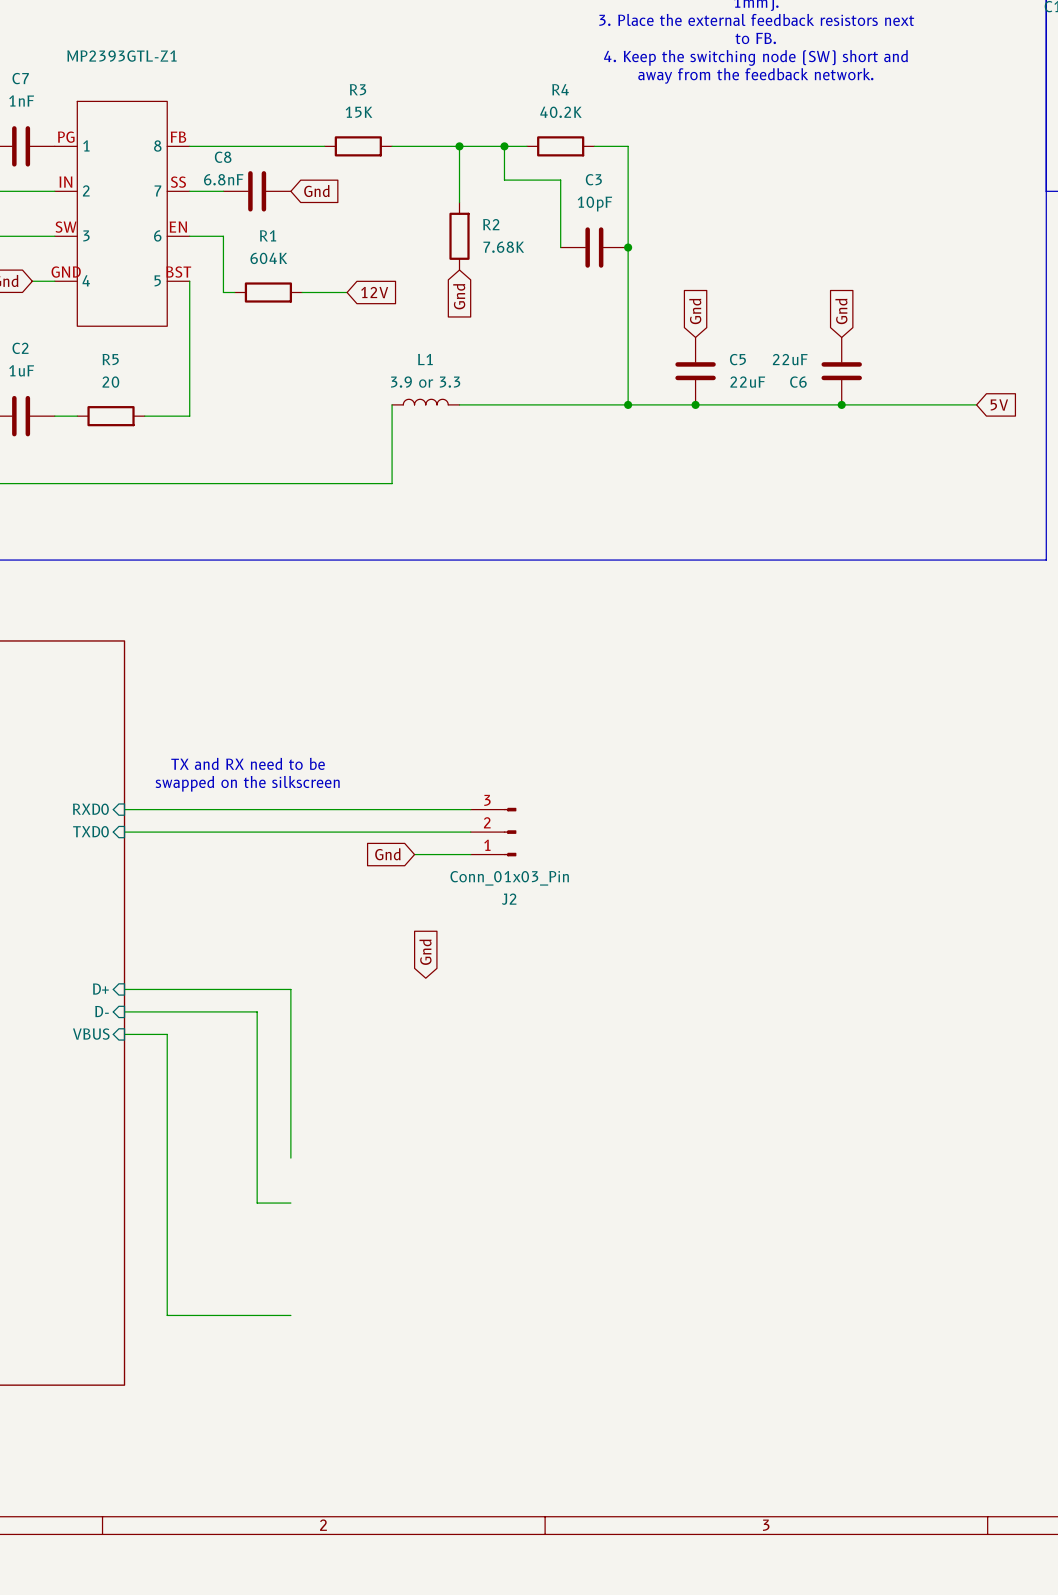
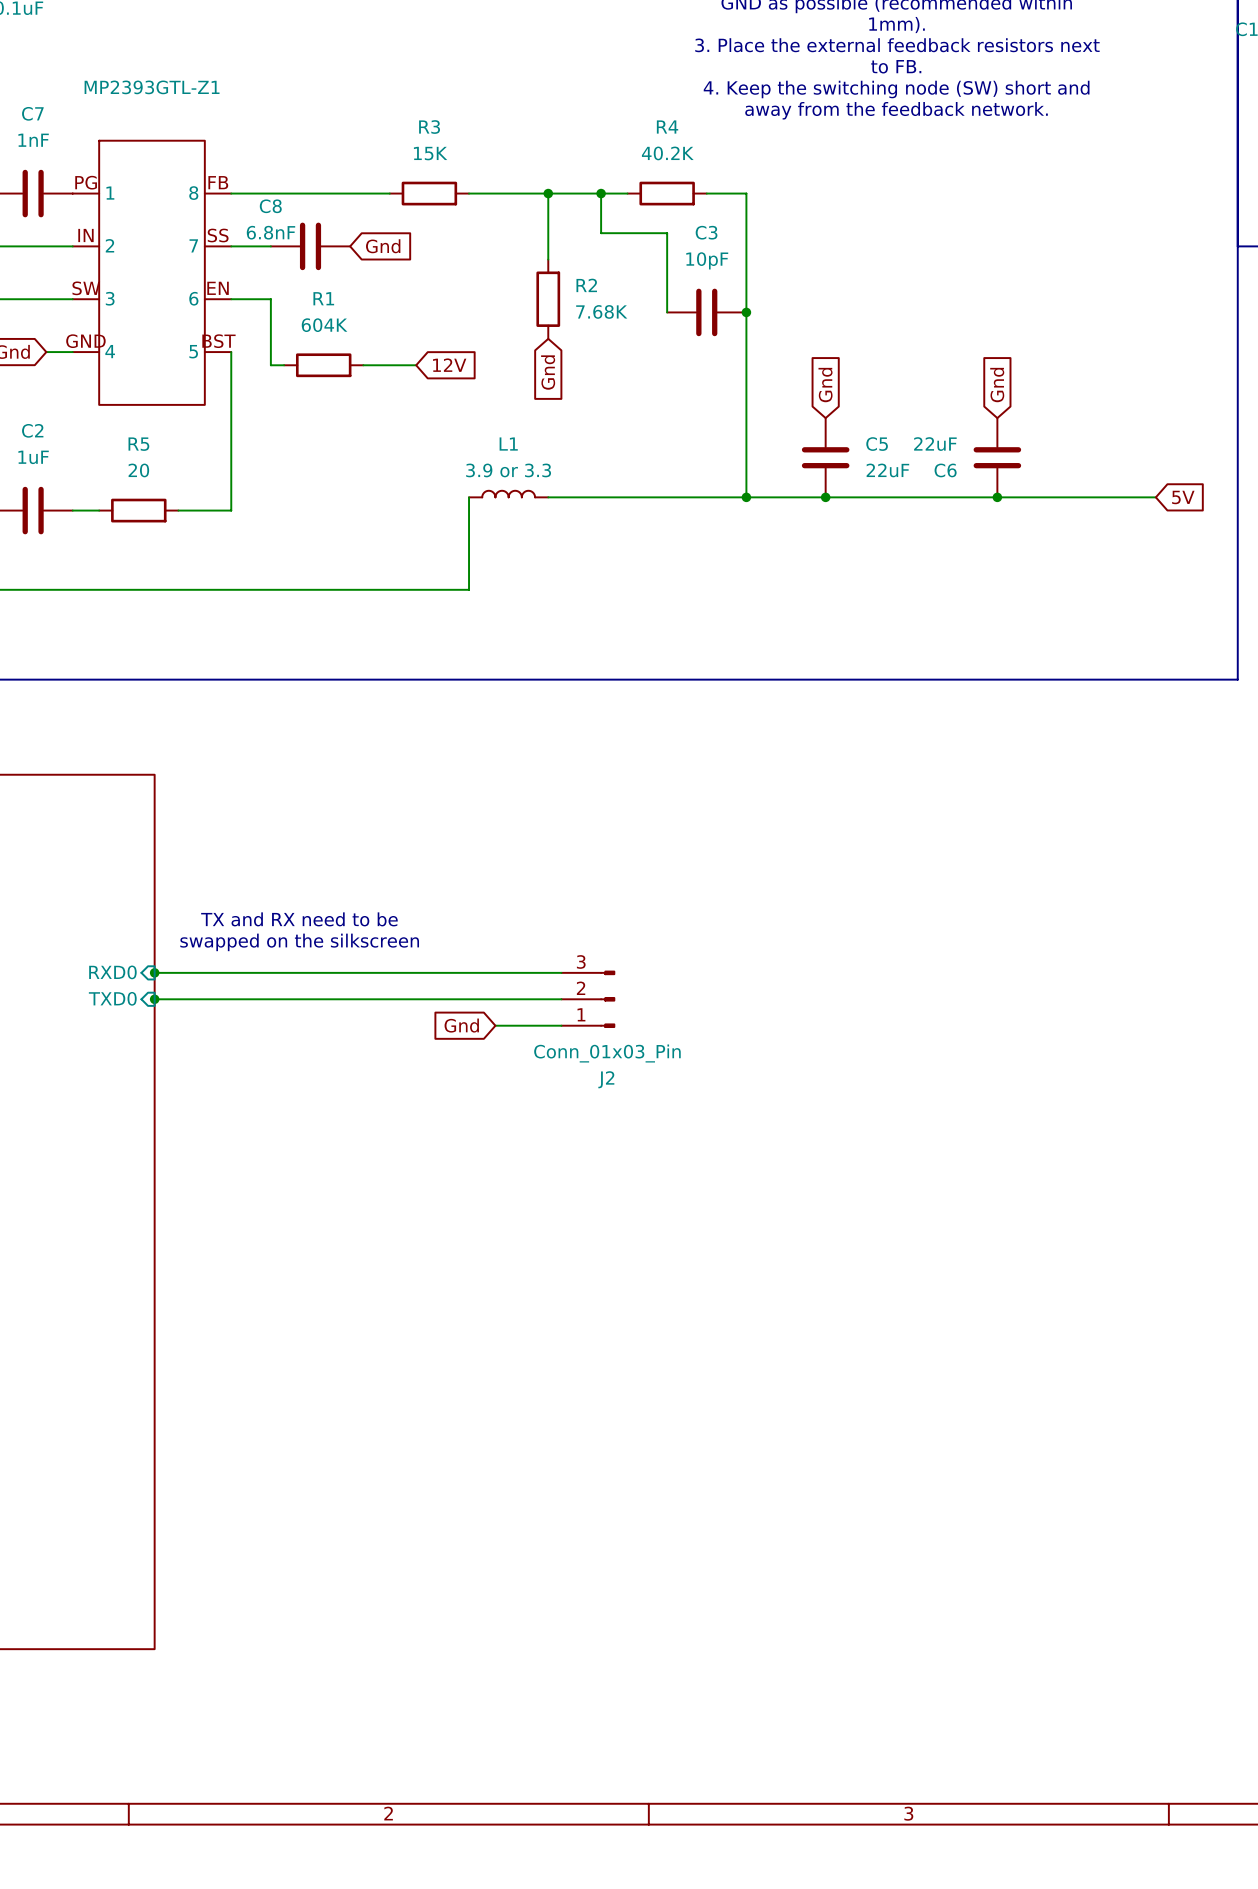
junction: none -> (154, 972)
junction: none -> (154, 999)
global label: Gnd (425, 952) -> none
sheet pin: D+ (100, 989) -> none
wire: (124, 989) (290, 989) (290, 1158) -> none
sheet pin: D- (101, 1011) -> none
wire: (124, 1011) (257, 1011) (257, 1203) (290, 1203) -> none
sheet pin: VBUS (91, 1034) -> none
wire: (124, 1034) (167, 1034) (167, 1315) (290, 1315) -> none

